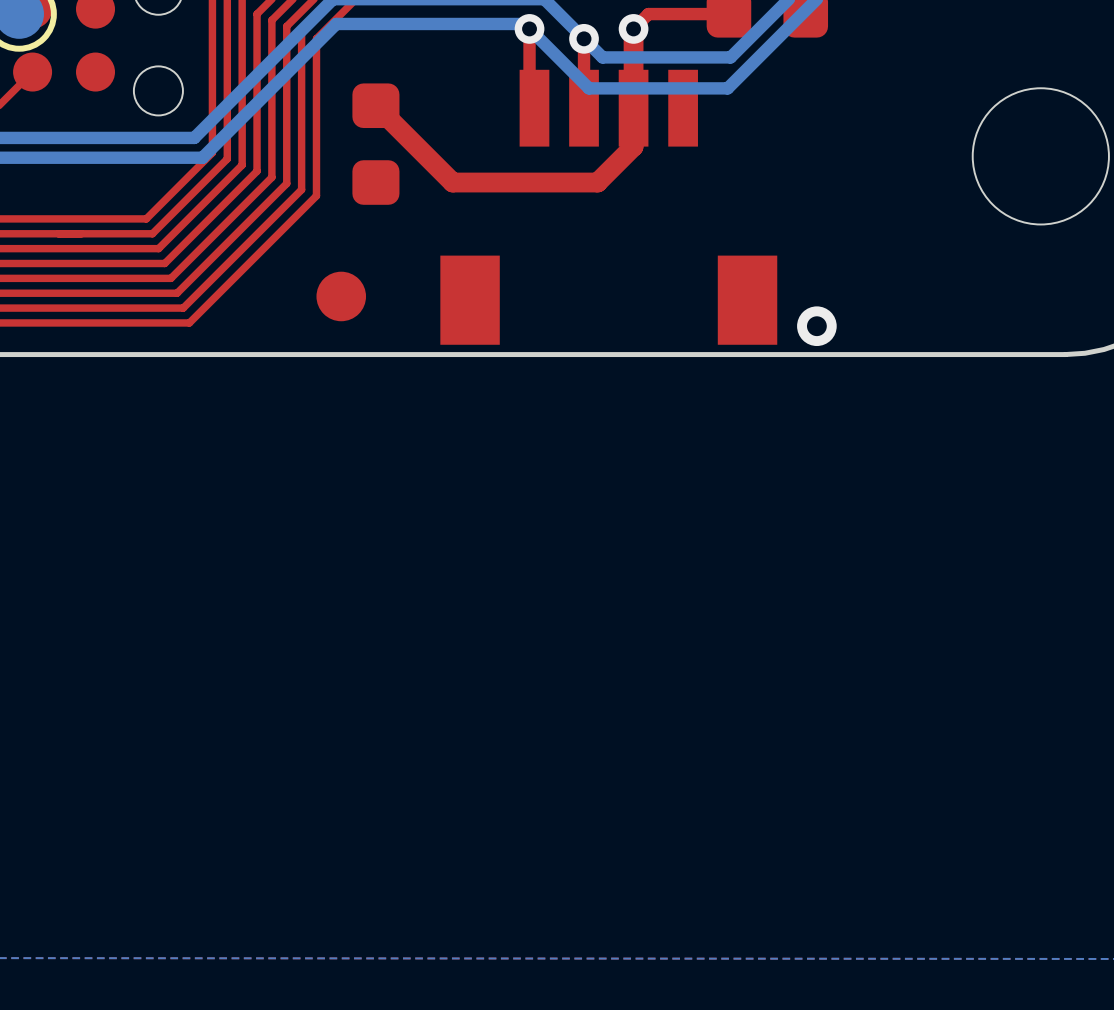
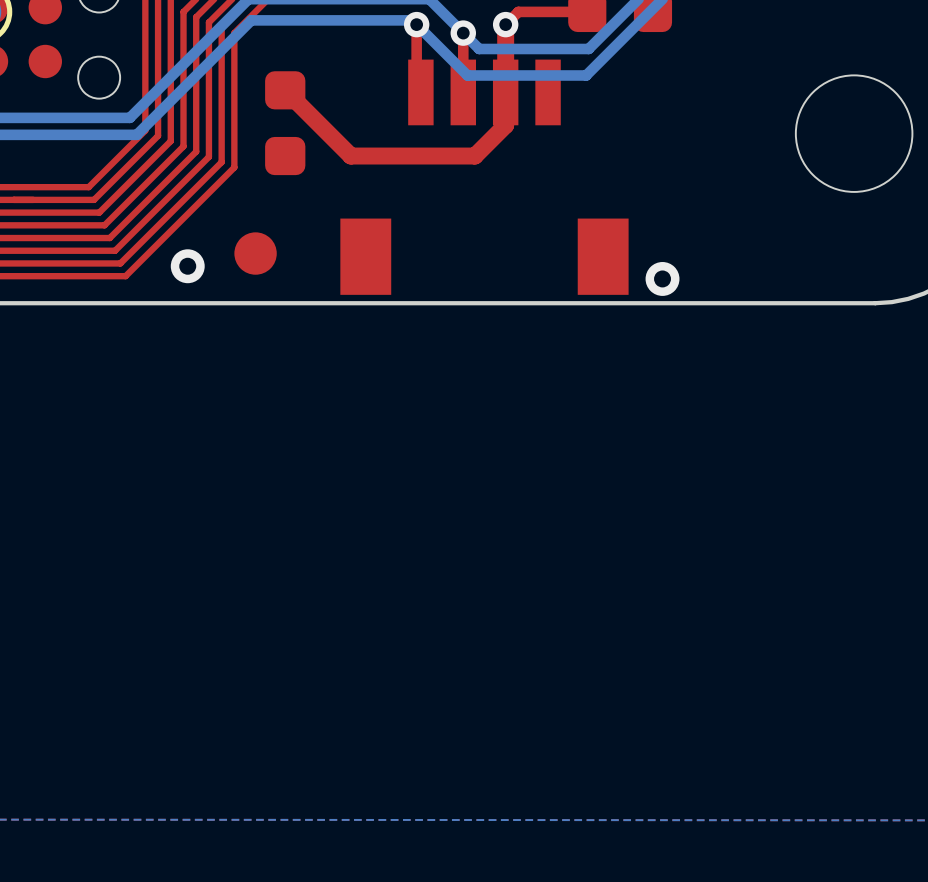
via: none -> (187, 266)

